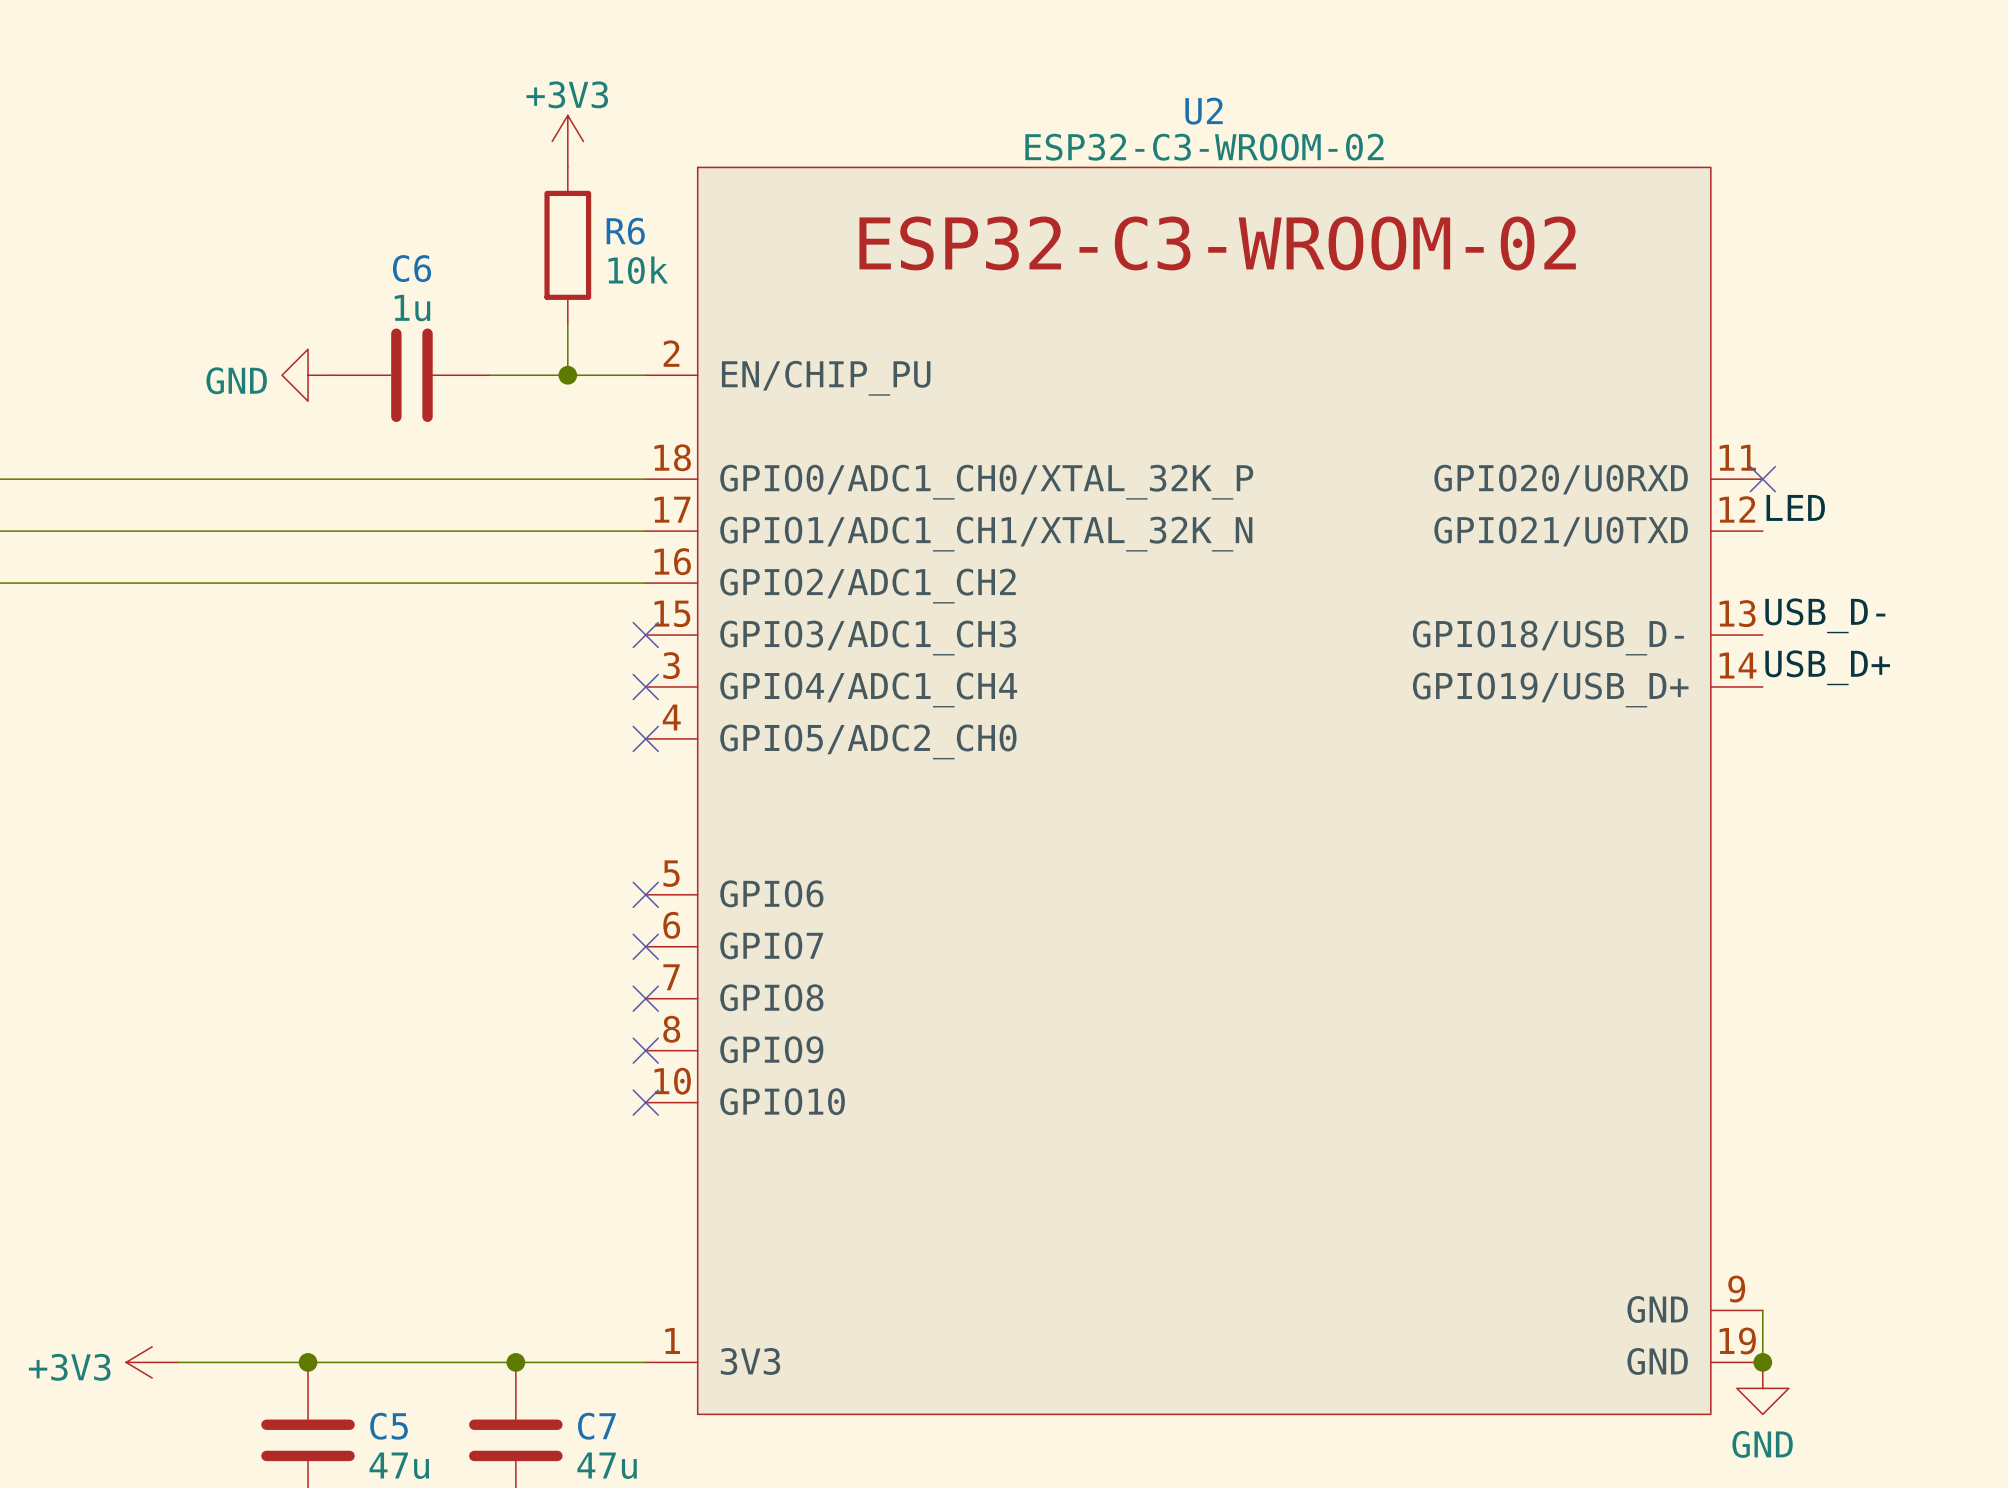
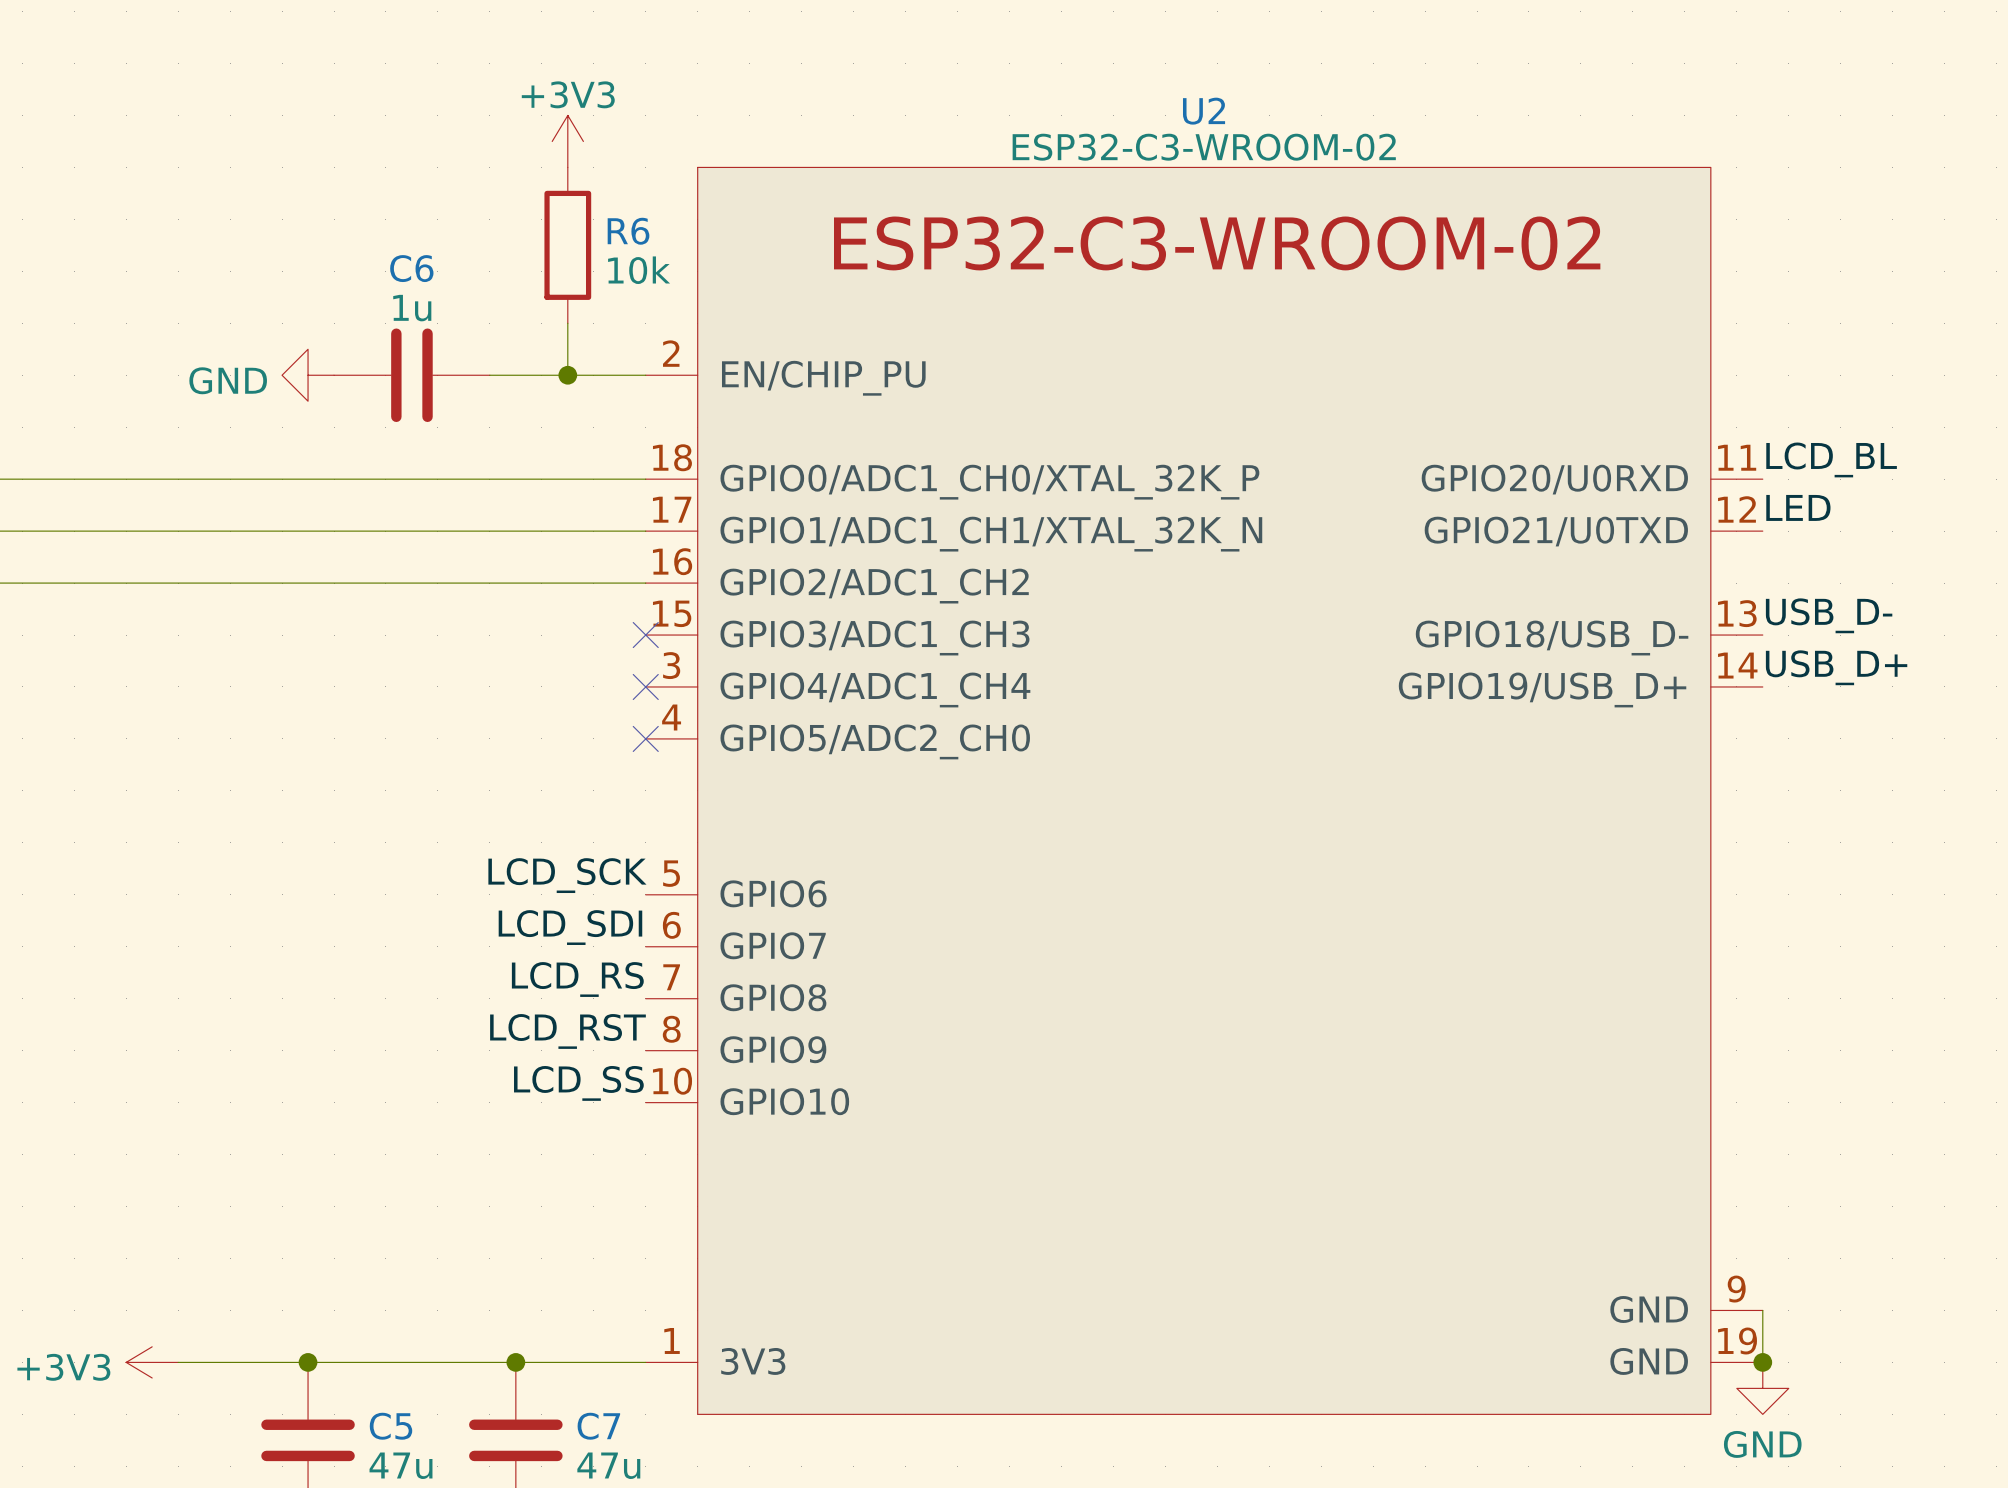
label: none -> LCD_BL (1831, 459)
no-connect mark: (1762, 479) -> none
label: none -> LCD_SCK (567, 875)
no-connect mark: (645, 894) -> none
label: none -> LCD_SDI (570, 927)
no-connect mark: (645, 946) -> none
label: none -> LCD_RS (577, 979)
no-connect mark: (645, 998) -> none
label: none -> LCD_RST (567, 1031)
no-connect mark: (645, 1050) -> none
label: none -> LCD_SS (578, 1083)
no-connect mark: (645, 1102) -> none

